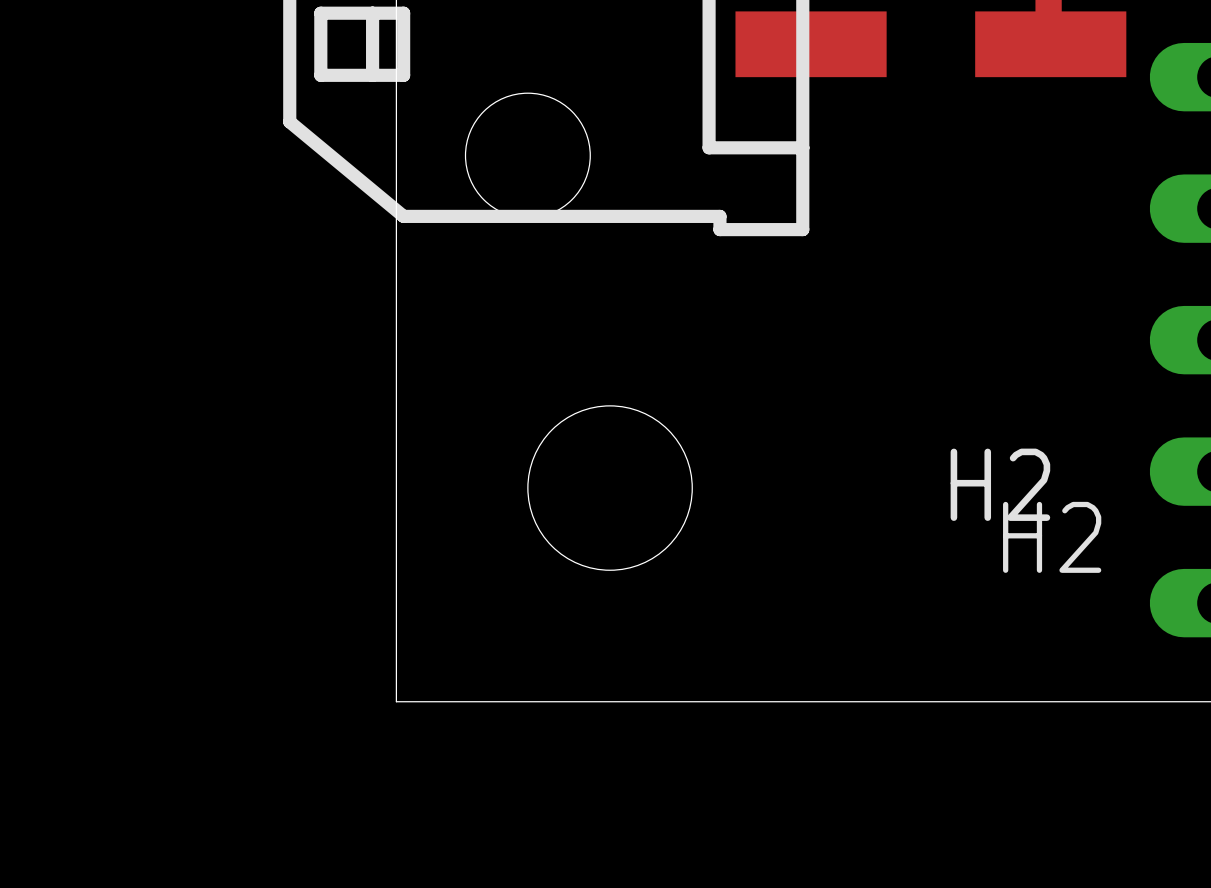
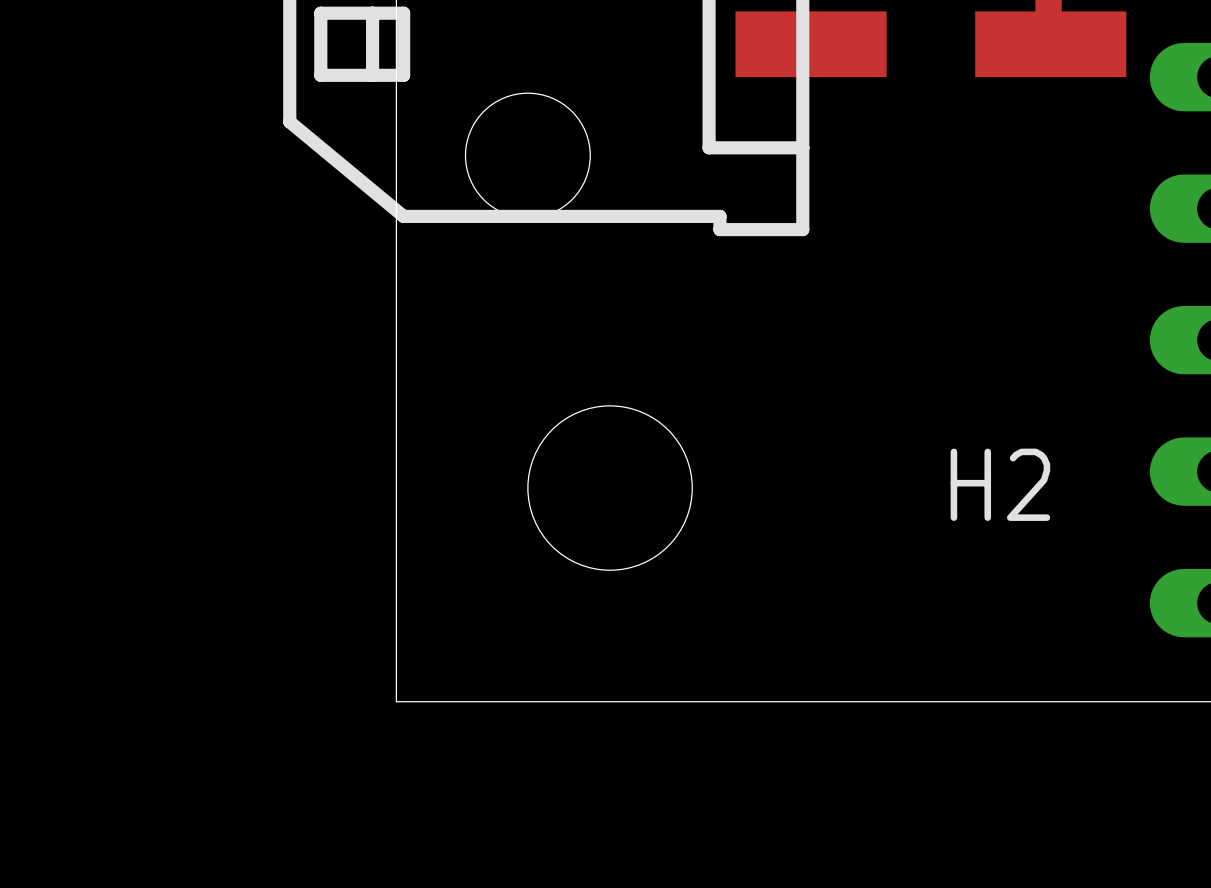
text: H2 (1052, 537) -> none

